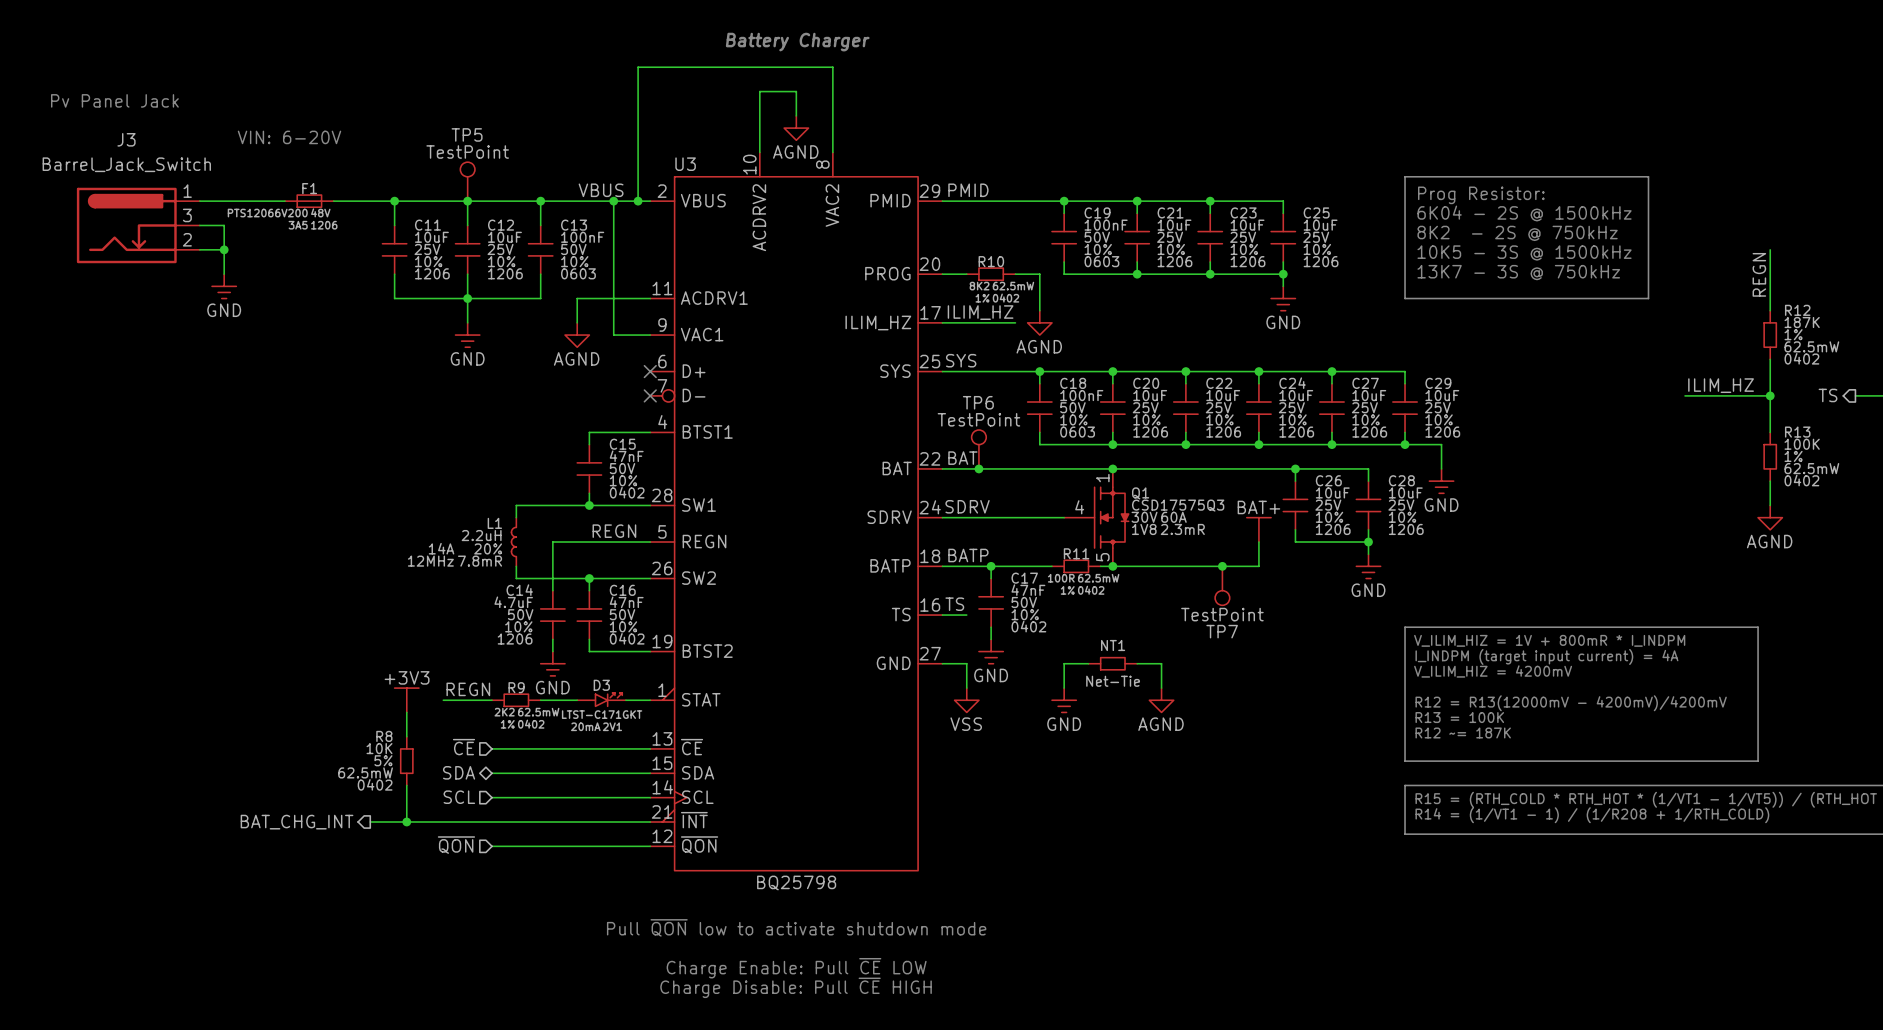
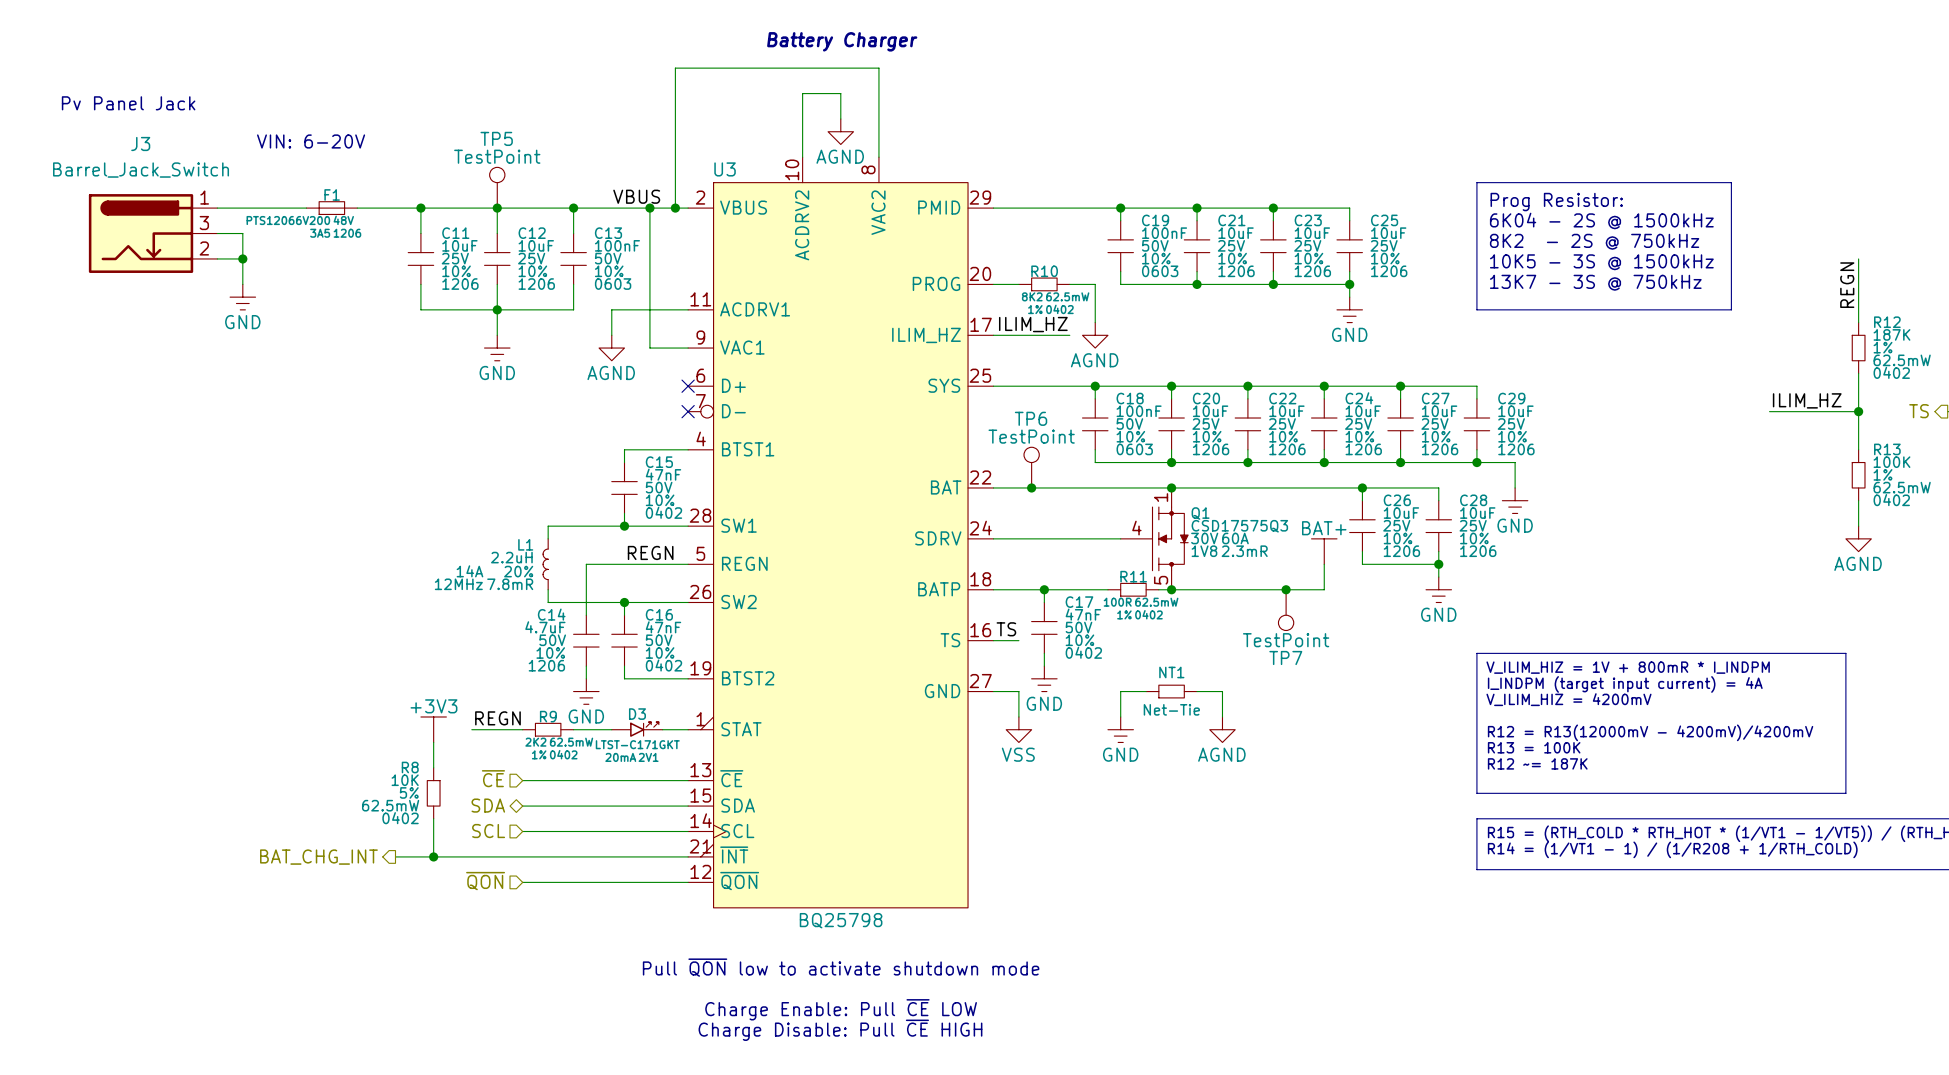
label: PMID (968, 190) -> none
label: SYS (961, 360) -> none
label: BAT (962, 458) -> none
label: SDRV (967, 506) -> none
label: BATP (968, 555) -> none

